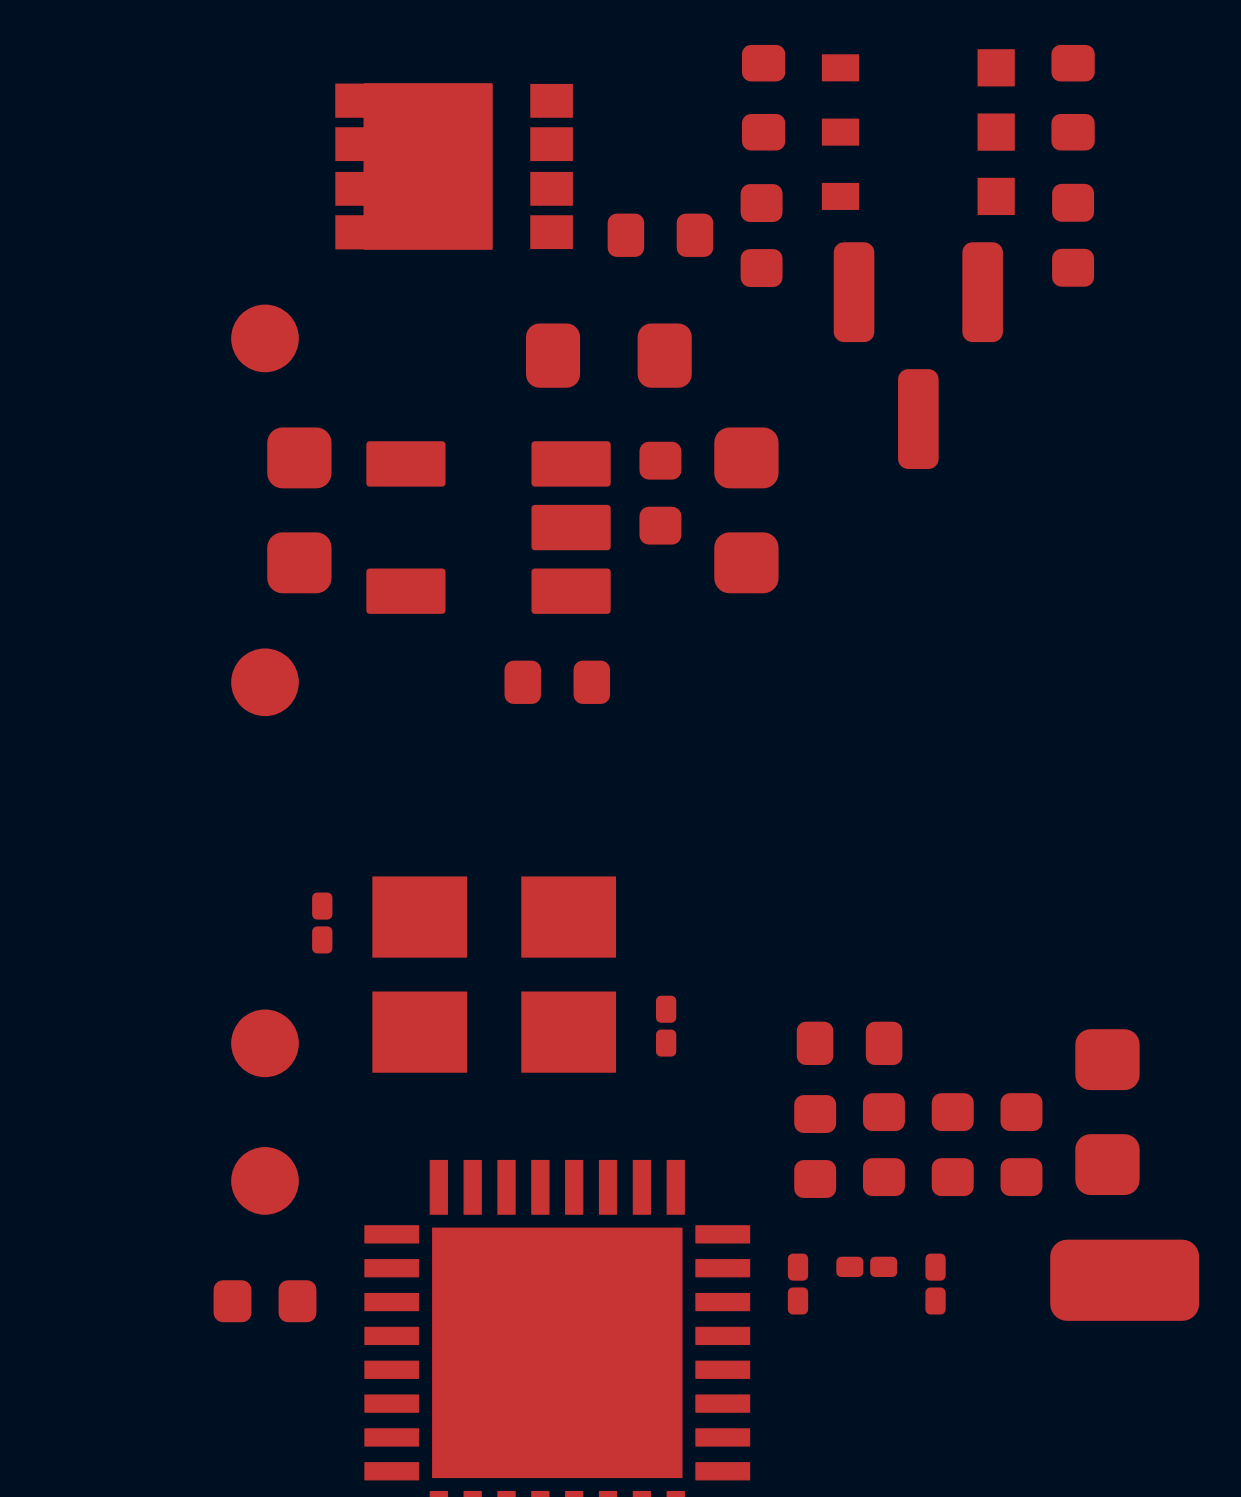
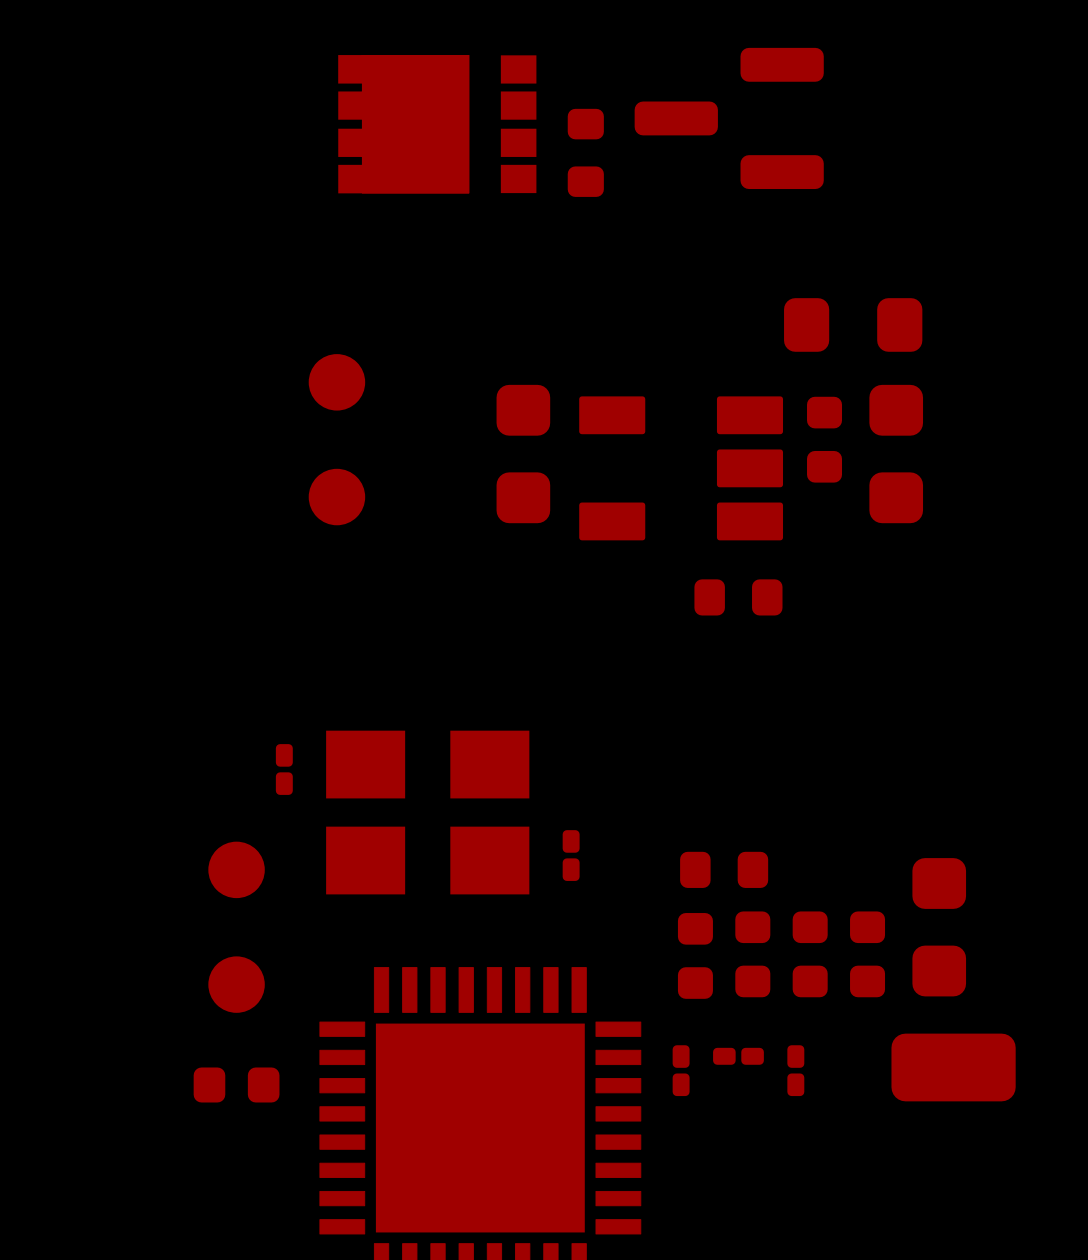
part: (763, 97) -> none
part: (1073, 97) -> none
part: (918, 132) -> none
part position: (454, 166) -> (437, 124)
part rotation: 0° (660, 235) -> 90° clockwise (585, 152)
part: (761, 235) -> none
part: (1073, 235) -> none
part: (265, 338) -> none
part position: (608, 355) -> (853, 324)
part rotation: 0° (918, 355) -> 90° clockwise (729, 118)
part position: (918, 355) -> (729, 118)
part: none -> (336, 382)
part: (660, 493) -> none
part: (299, 510) -> none
part position: (746, 510) -> (523, 454)
part position: (488, 527) -> (681, 468)
part: none -> (824, 439)
part: none -> (896, 454)
part: none -> (336, 497)
part: (265, 682) -> none
part: (557, 682) -> none
part: none -> (738, 597)

